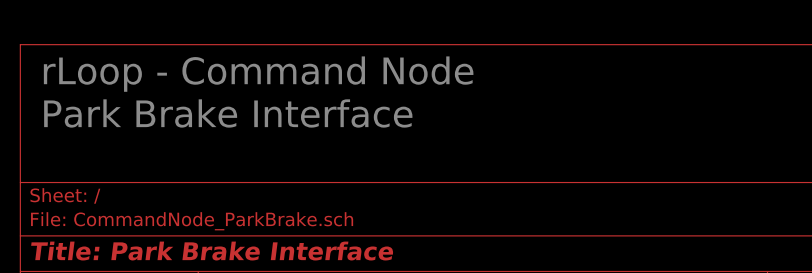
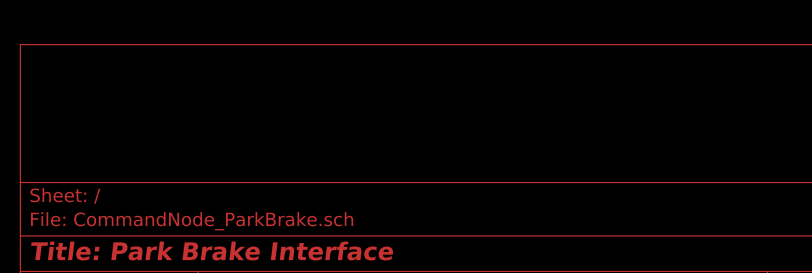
text: rLoop - Command Node (258, 74) -> none
text: Park Brake Interface (228, 113) -> none

